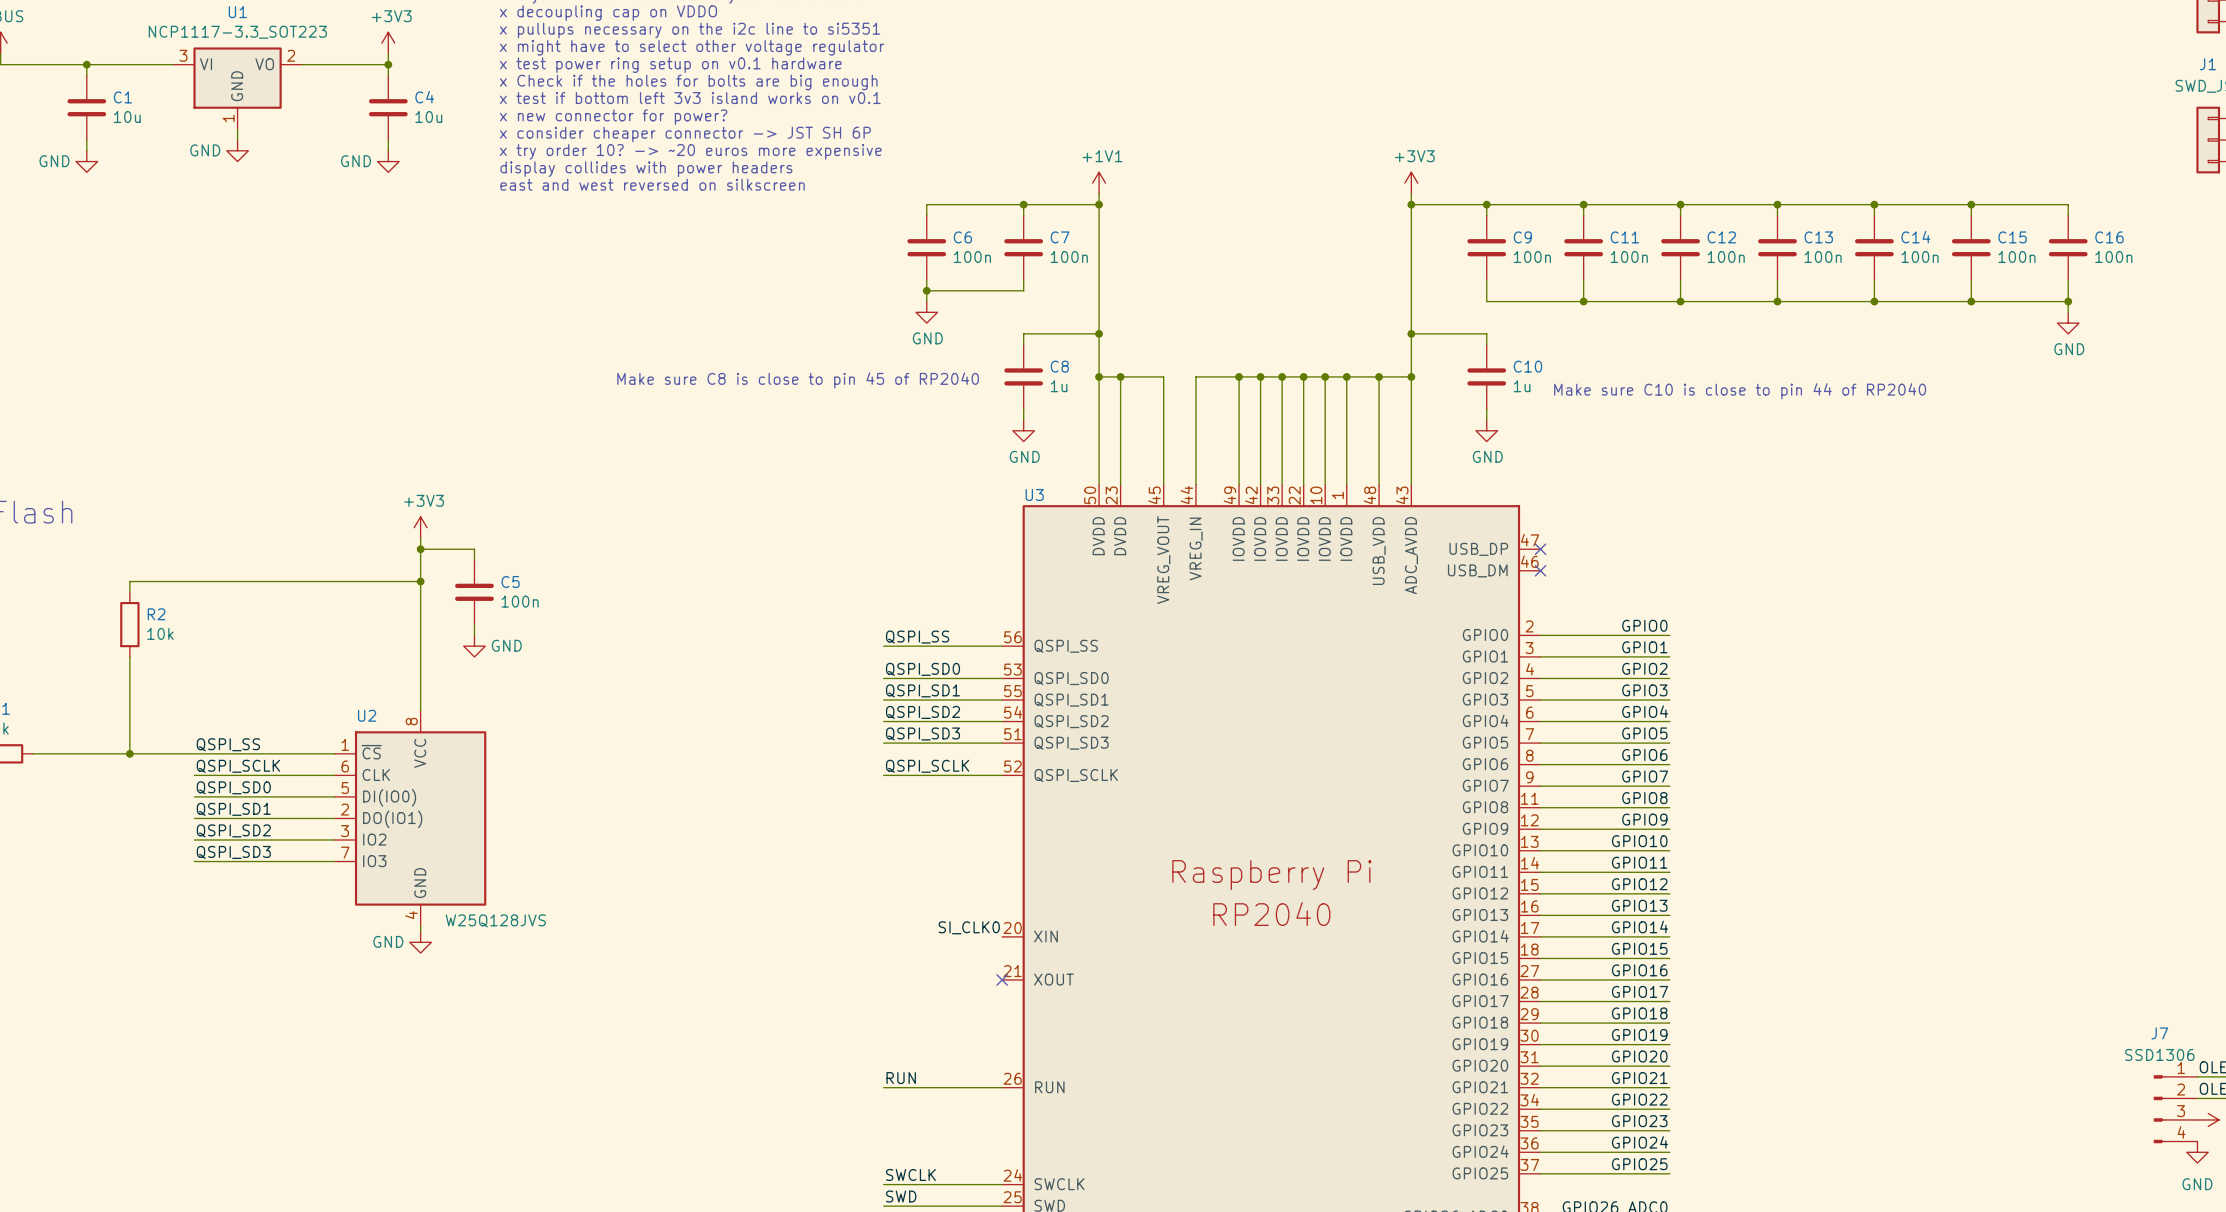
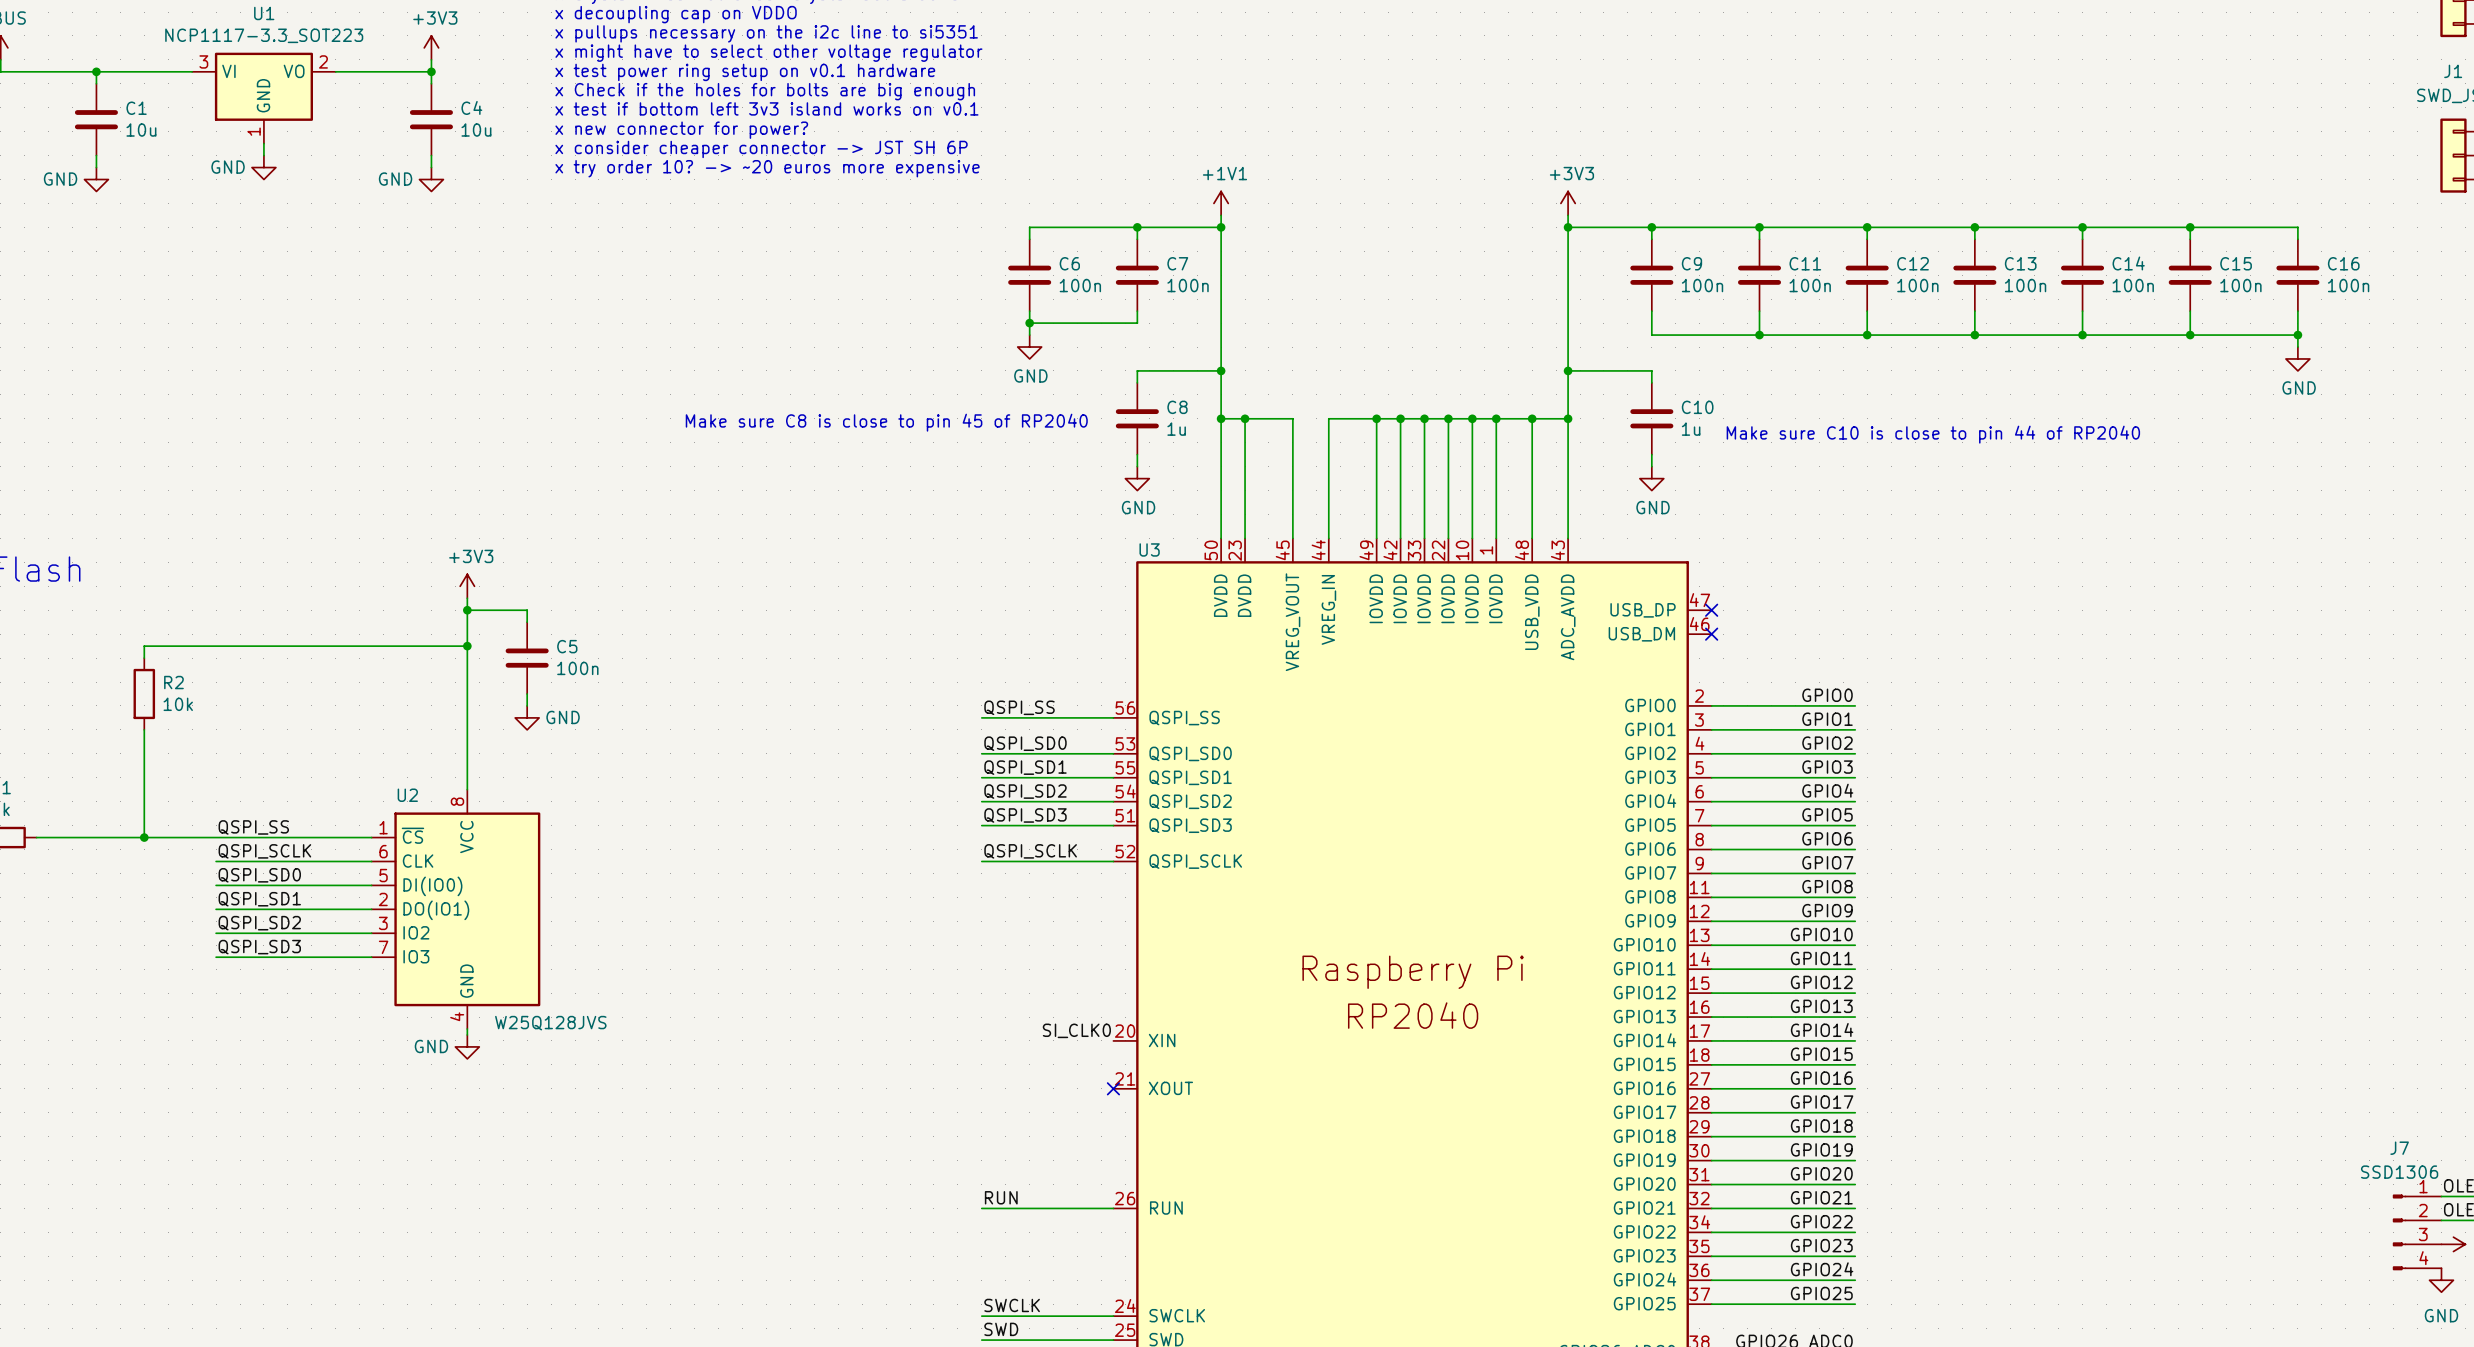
text: display collides with power headers (646, 169) -> none
text: east and west reversed on silkscreen (652, 184) -> none

